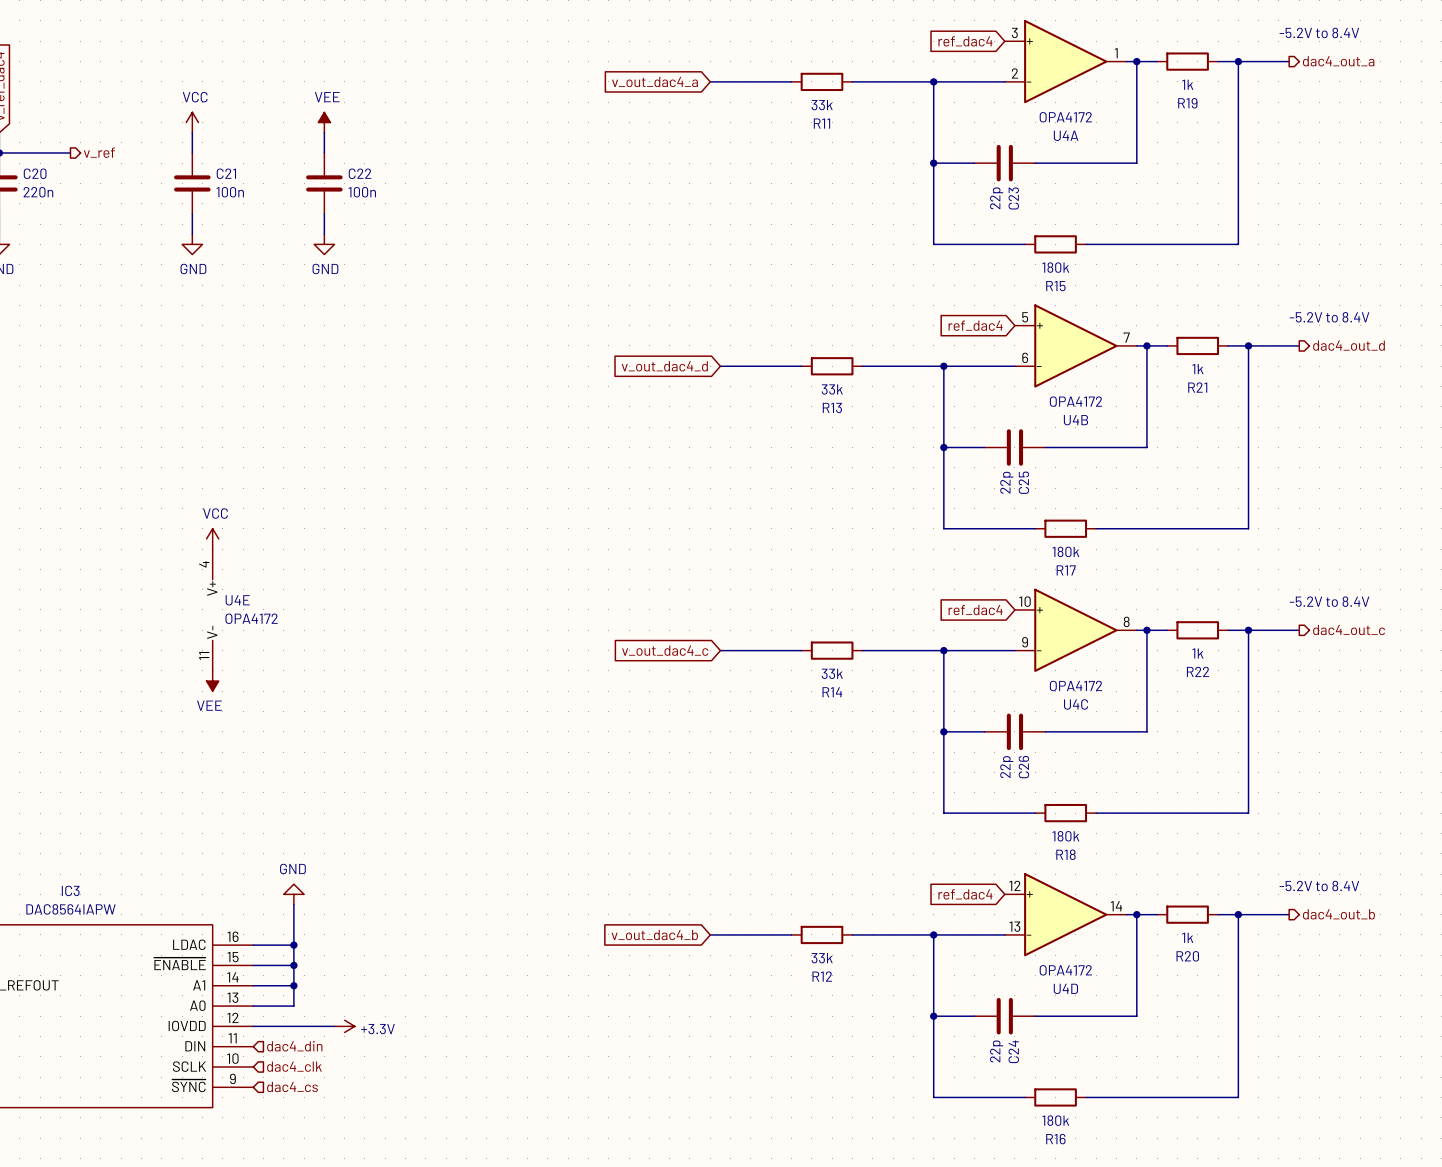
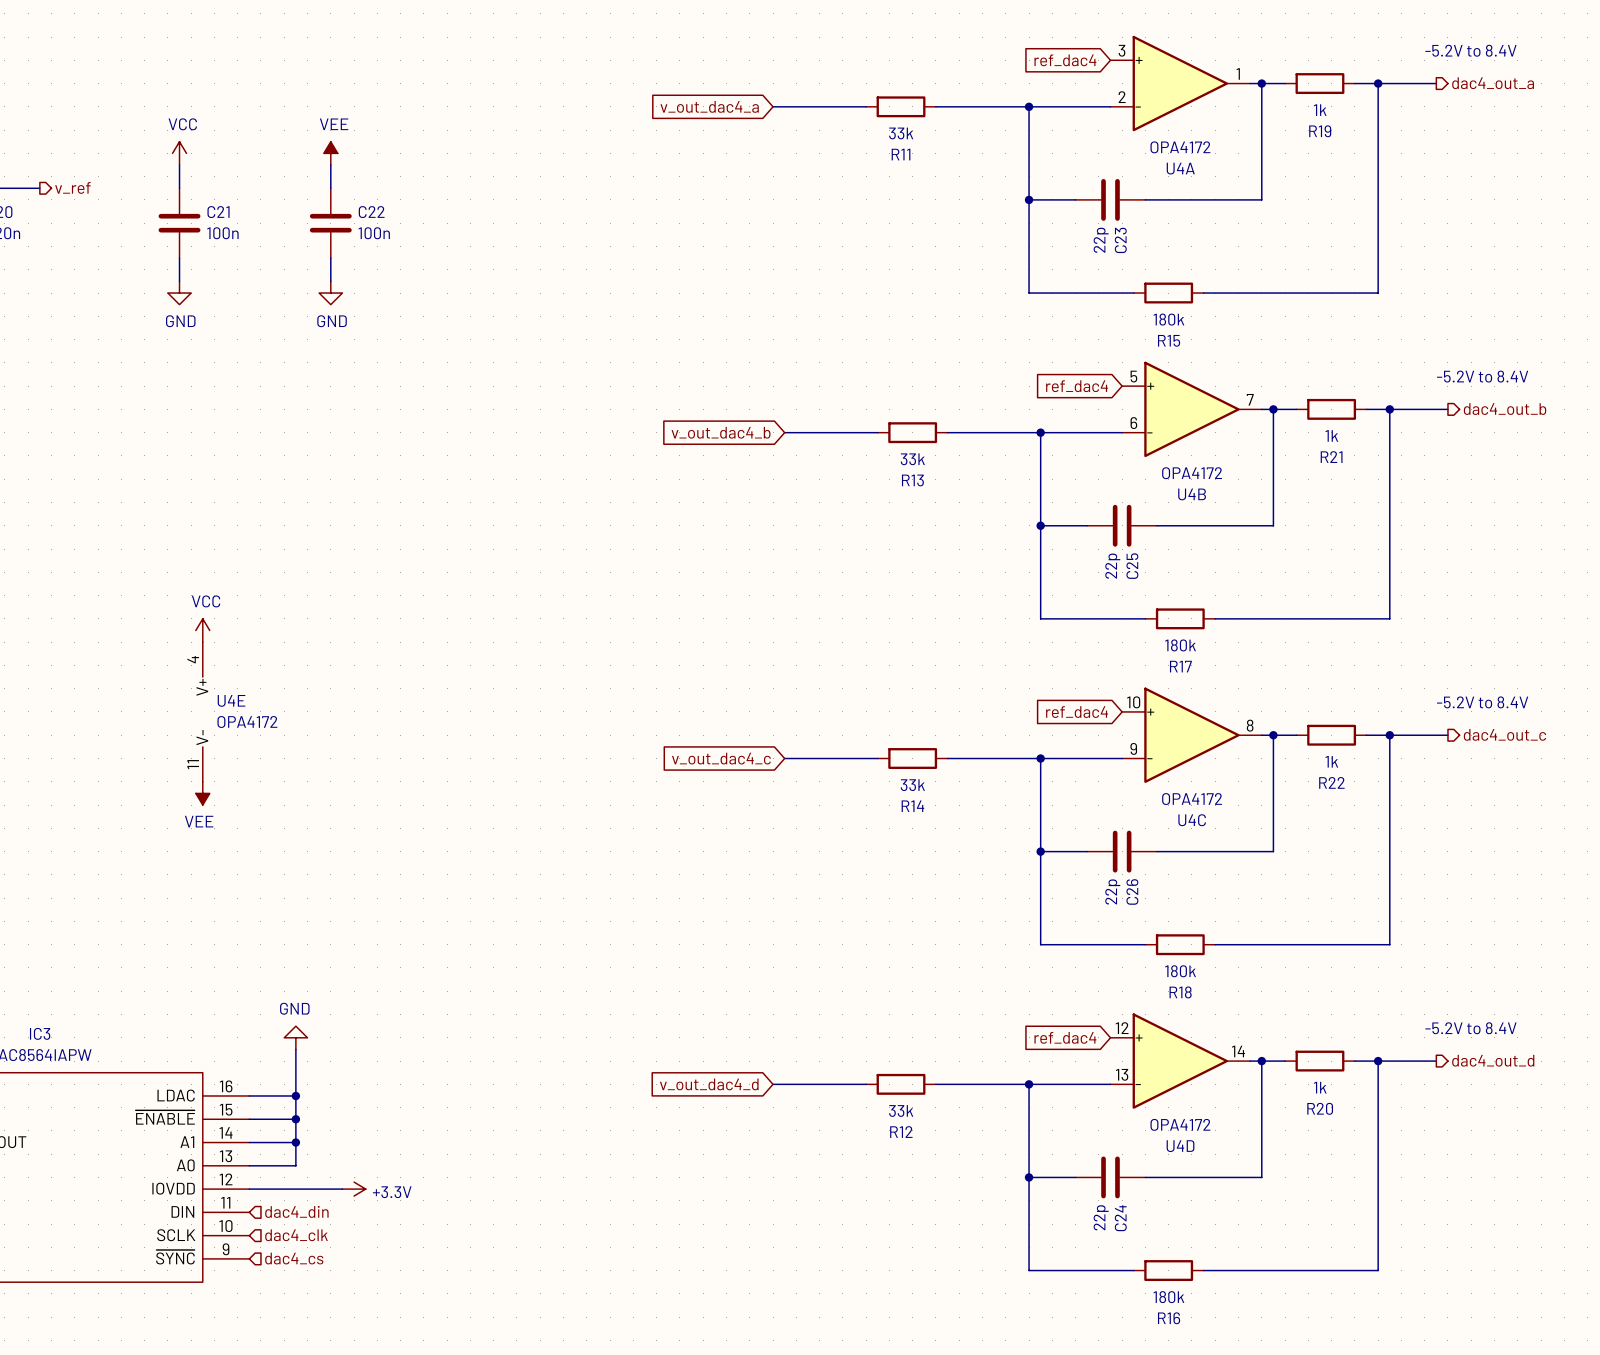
hierarchical label: dac4_out_d (1348, 345) -> dac4_out_b (1505, 409)
global label: v_out_dac4_d (664, 366) -> v_out_dac4_b (721, 432)
hierarchical label: dac4_out_b (1338, 914) -> dac4_out_d (1493, 1060)
global label: v_out_dac4_b (654, 935) -> v_out_dac4_d (709, 1084)

